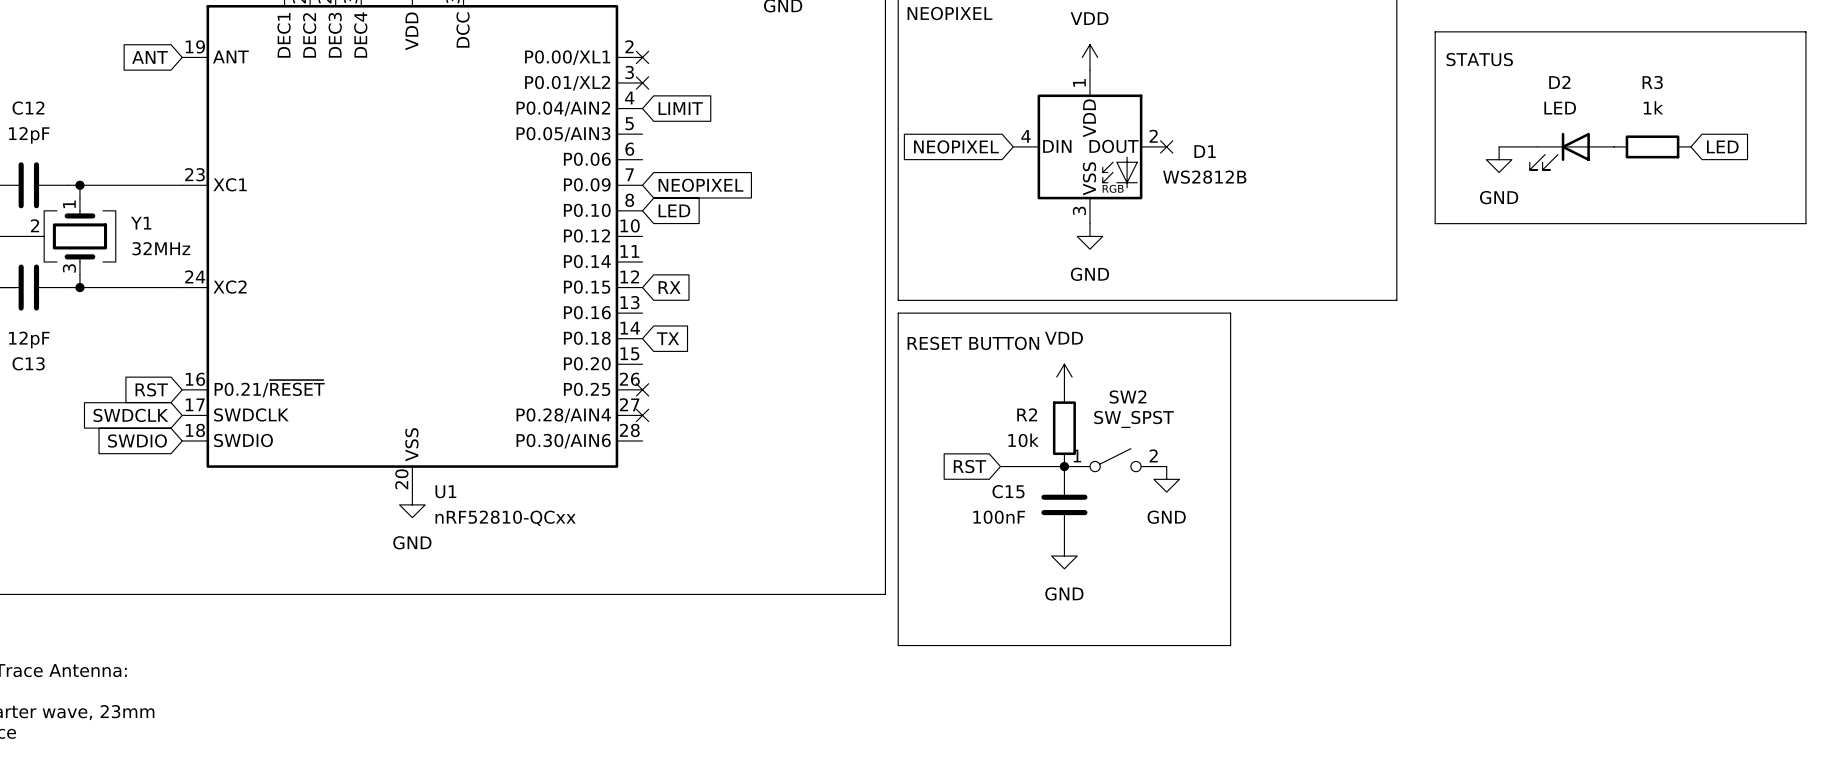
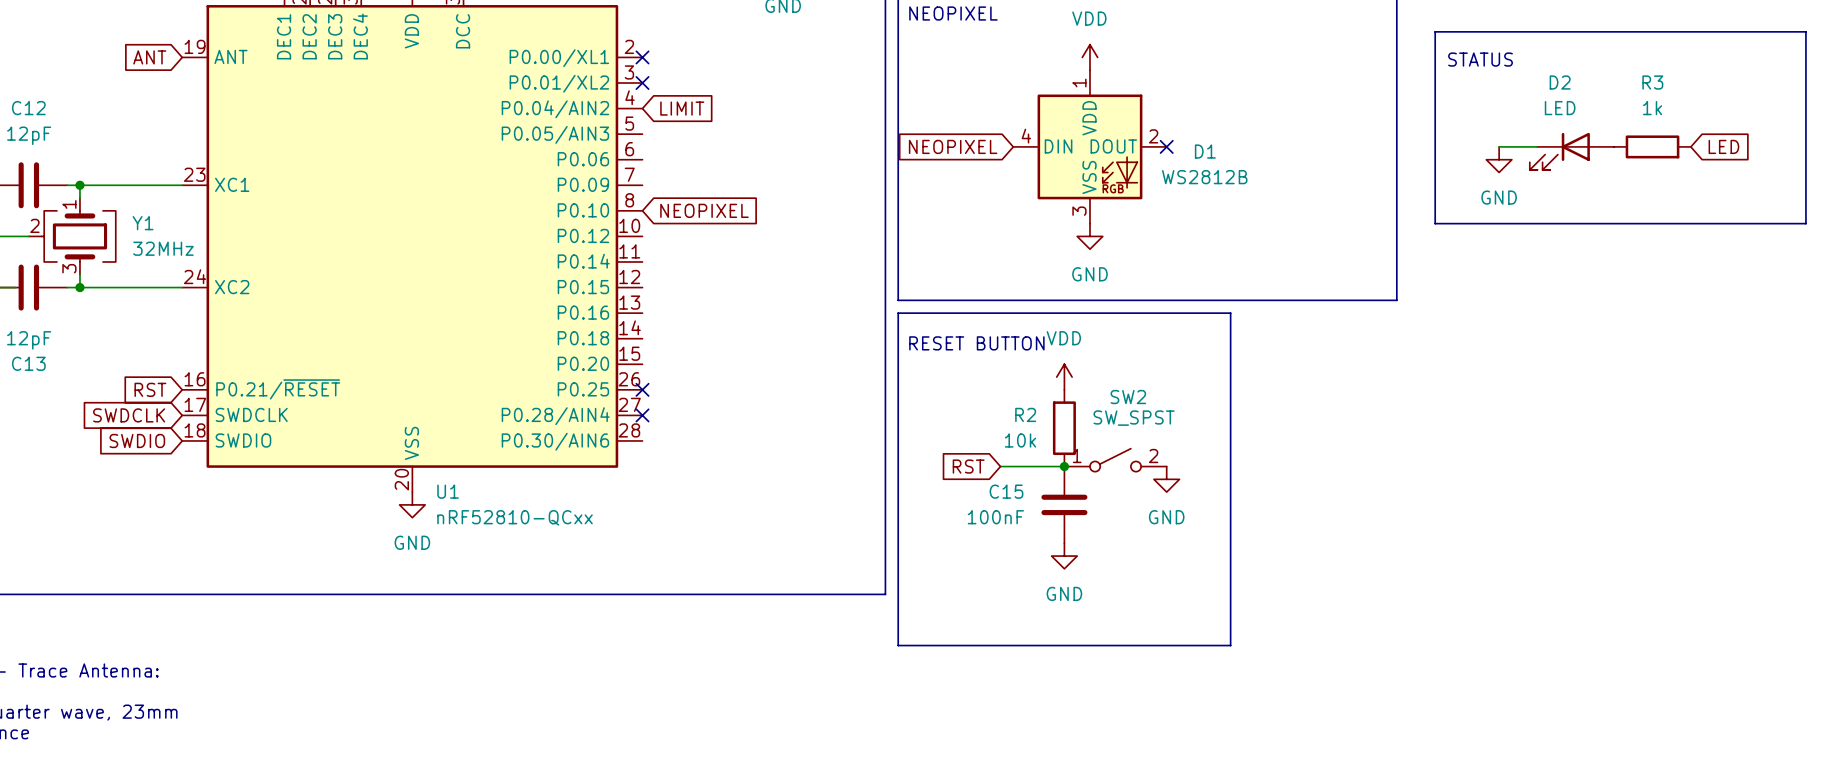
global label: NEOPIXEL (701, 185) -> none
global label: LED (674, 210) -> NEOPIXEL (704, 210)
global label: RX (669, 287) -> none
global label: TX (667, 338) -> none

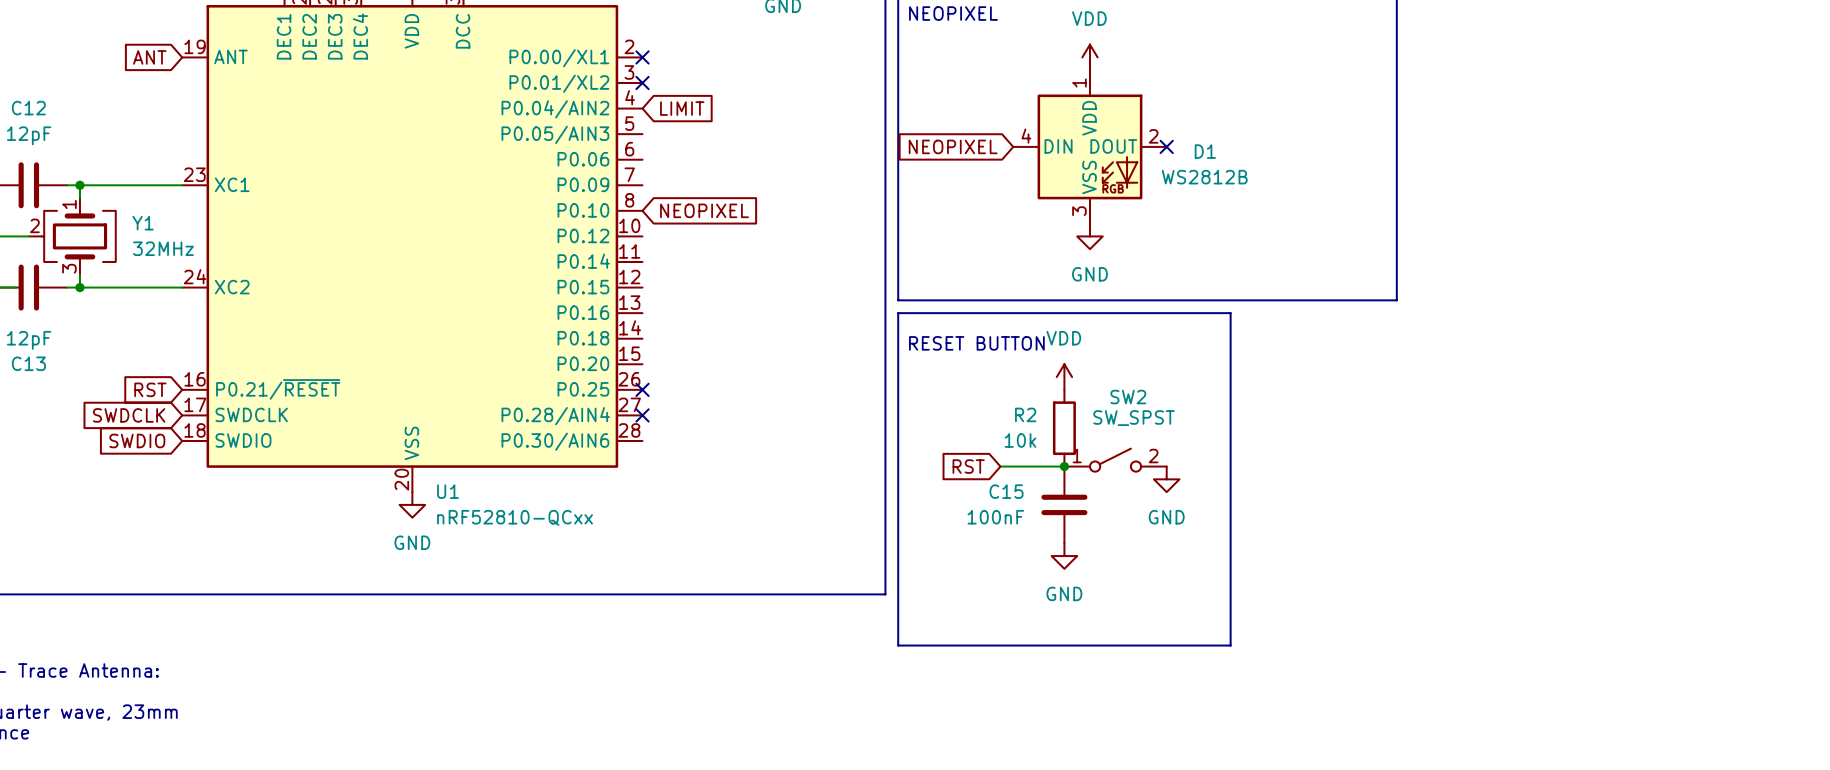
line: (1435, 31) (1805, 31) (1805, 223) (1435, 223) (1435, 31) -> none
text: STATUS (1480, 59) -> none
wire: (1499, 146) (1537, 146) -> none
R3: 1k (1652, 146) -> none
global label: LED (1723, 146) -> none
D2: LED (1571, 151) -> none
power symbol: GND (1499, 159) -> none

